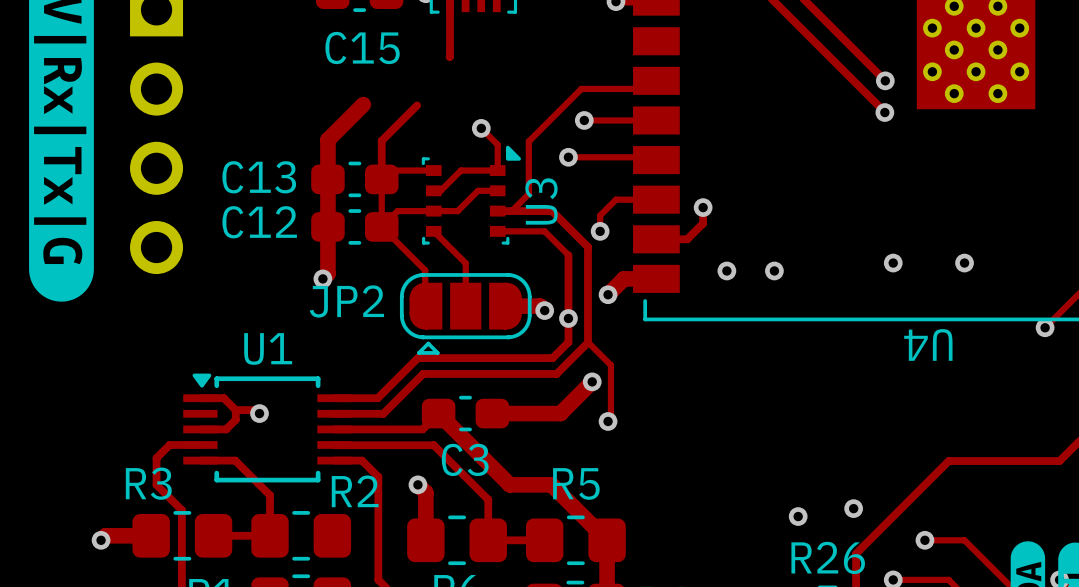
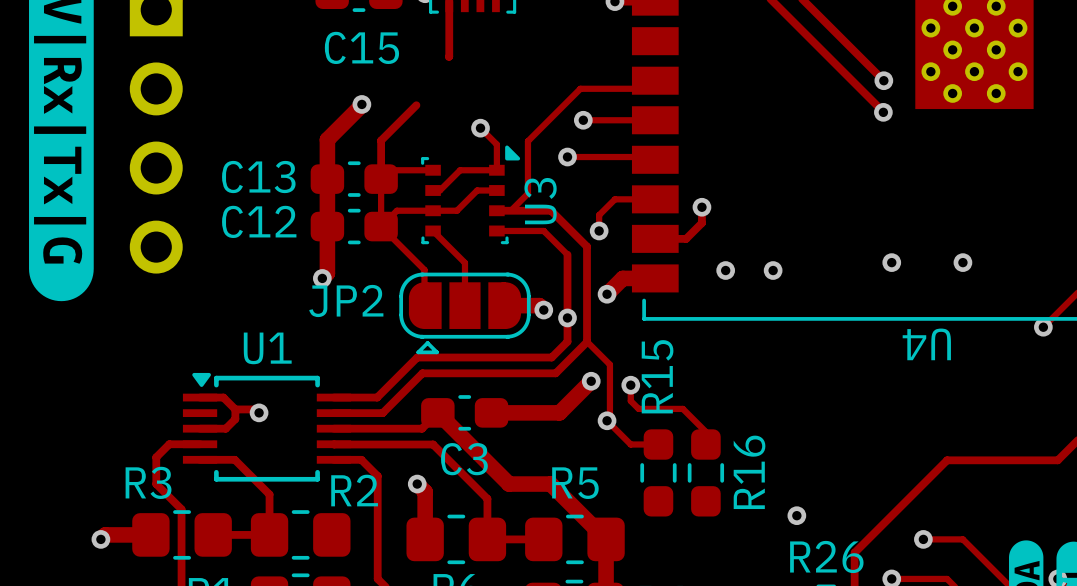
via: none -> (361, 104)
track: none -> (630, 385) (630, 401) (638, 408) (682, 408) (705, 431) (705, 444)
via: none -> (630, 385)
track: none -> (607, 420) (630, 444) (658, 444)
R15: none -> (658, 472)
R16: none -> (705, 472)
via: (853, 508) -> none

